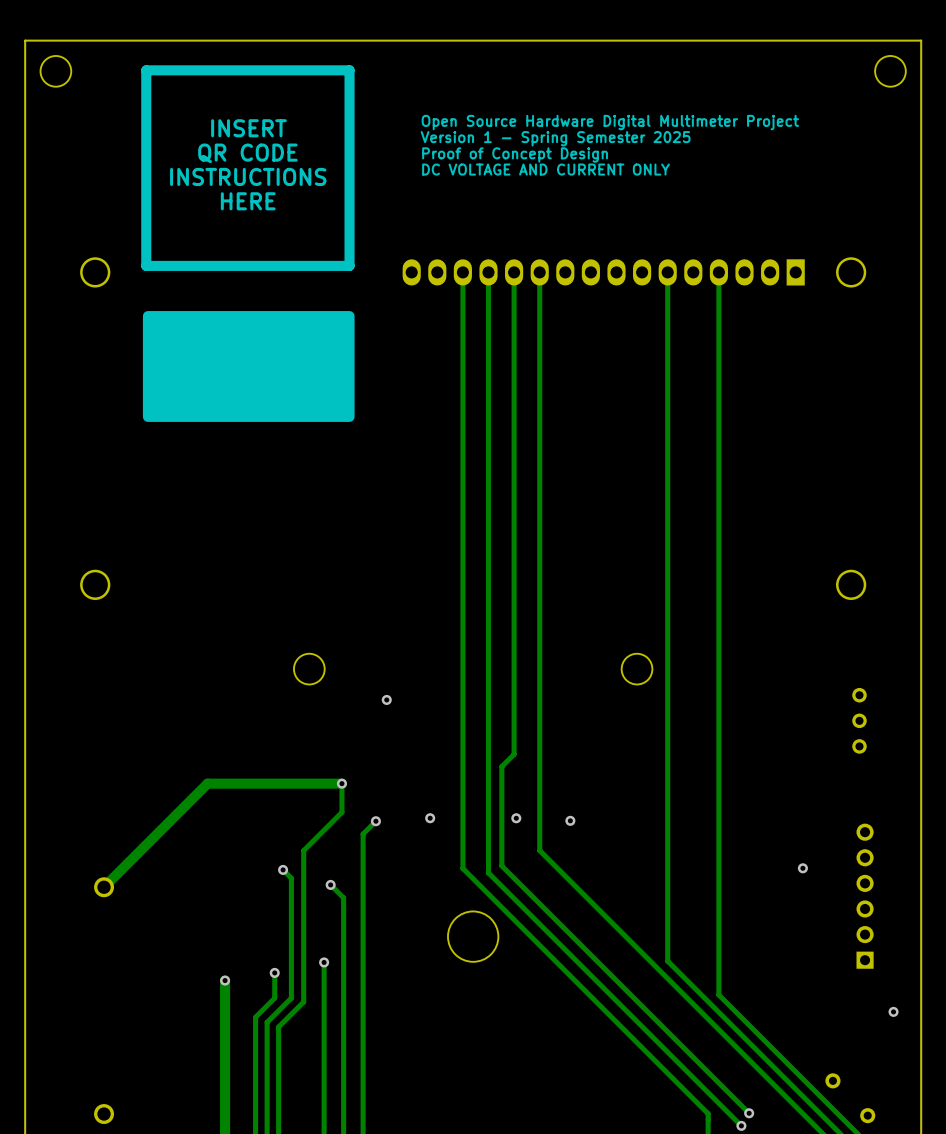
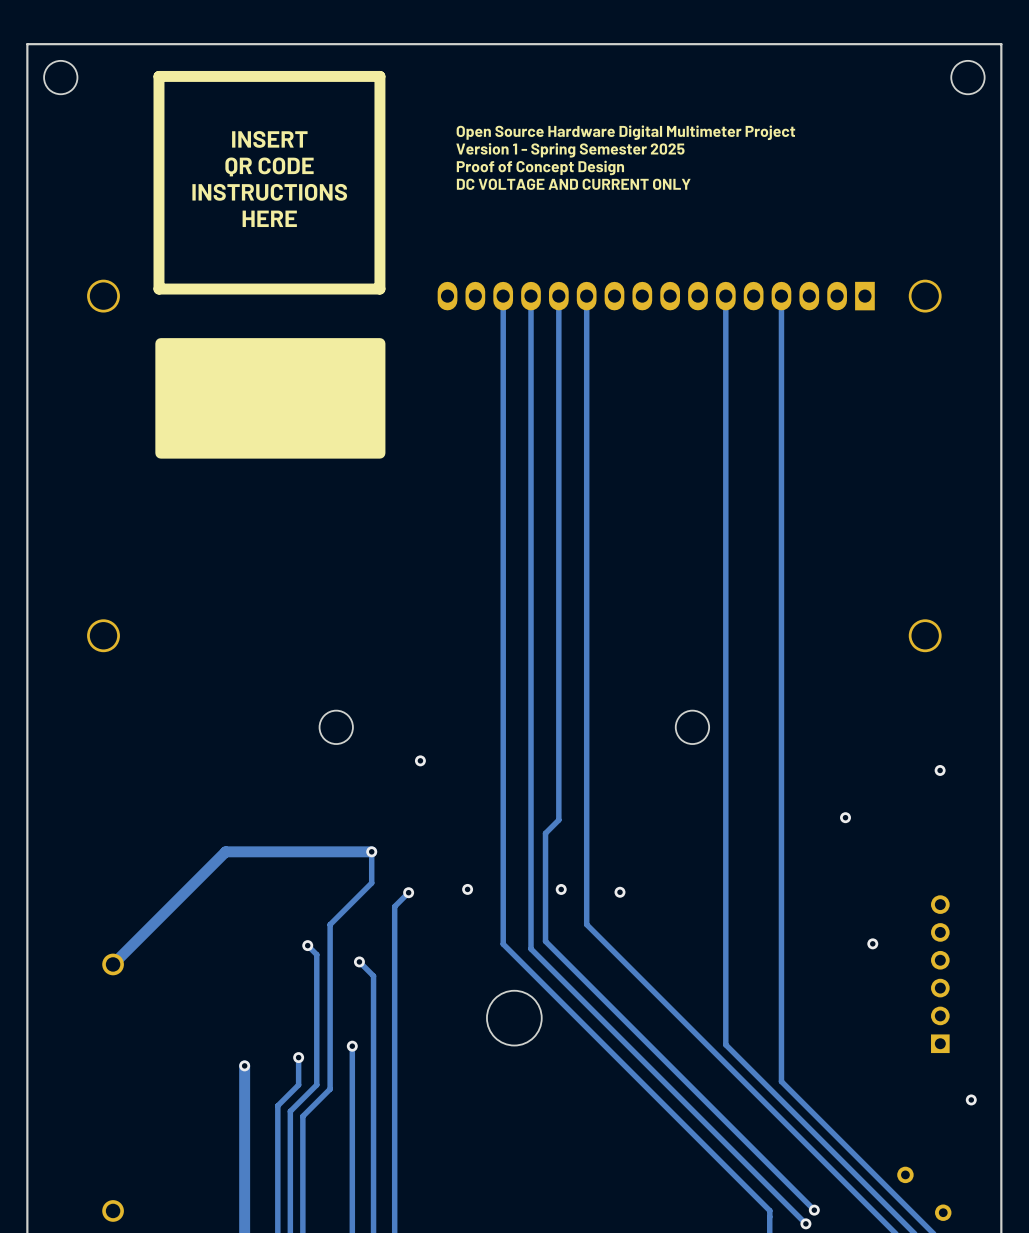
via: none -> (940, 770)
part: (859, 720) -> none
via: none -> (845, 817)

